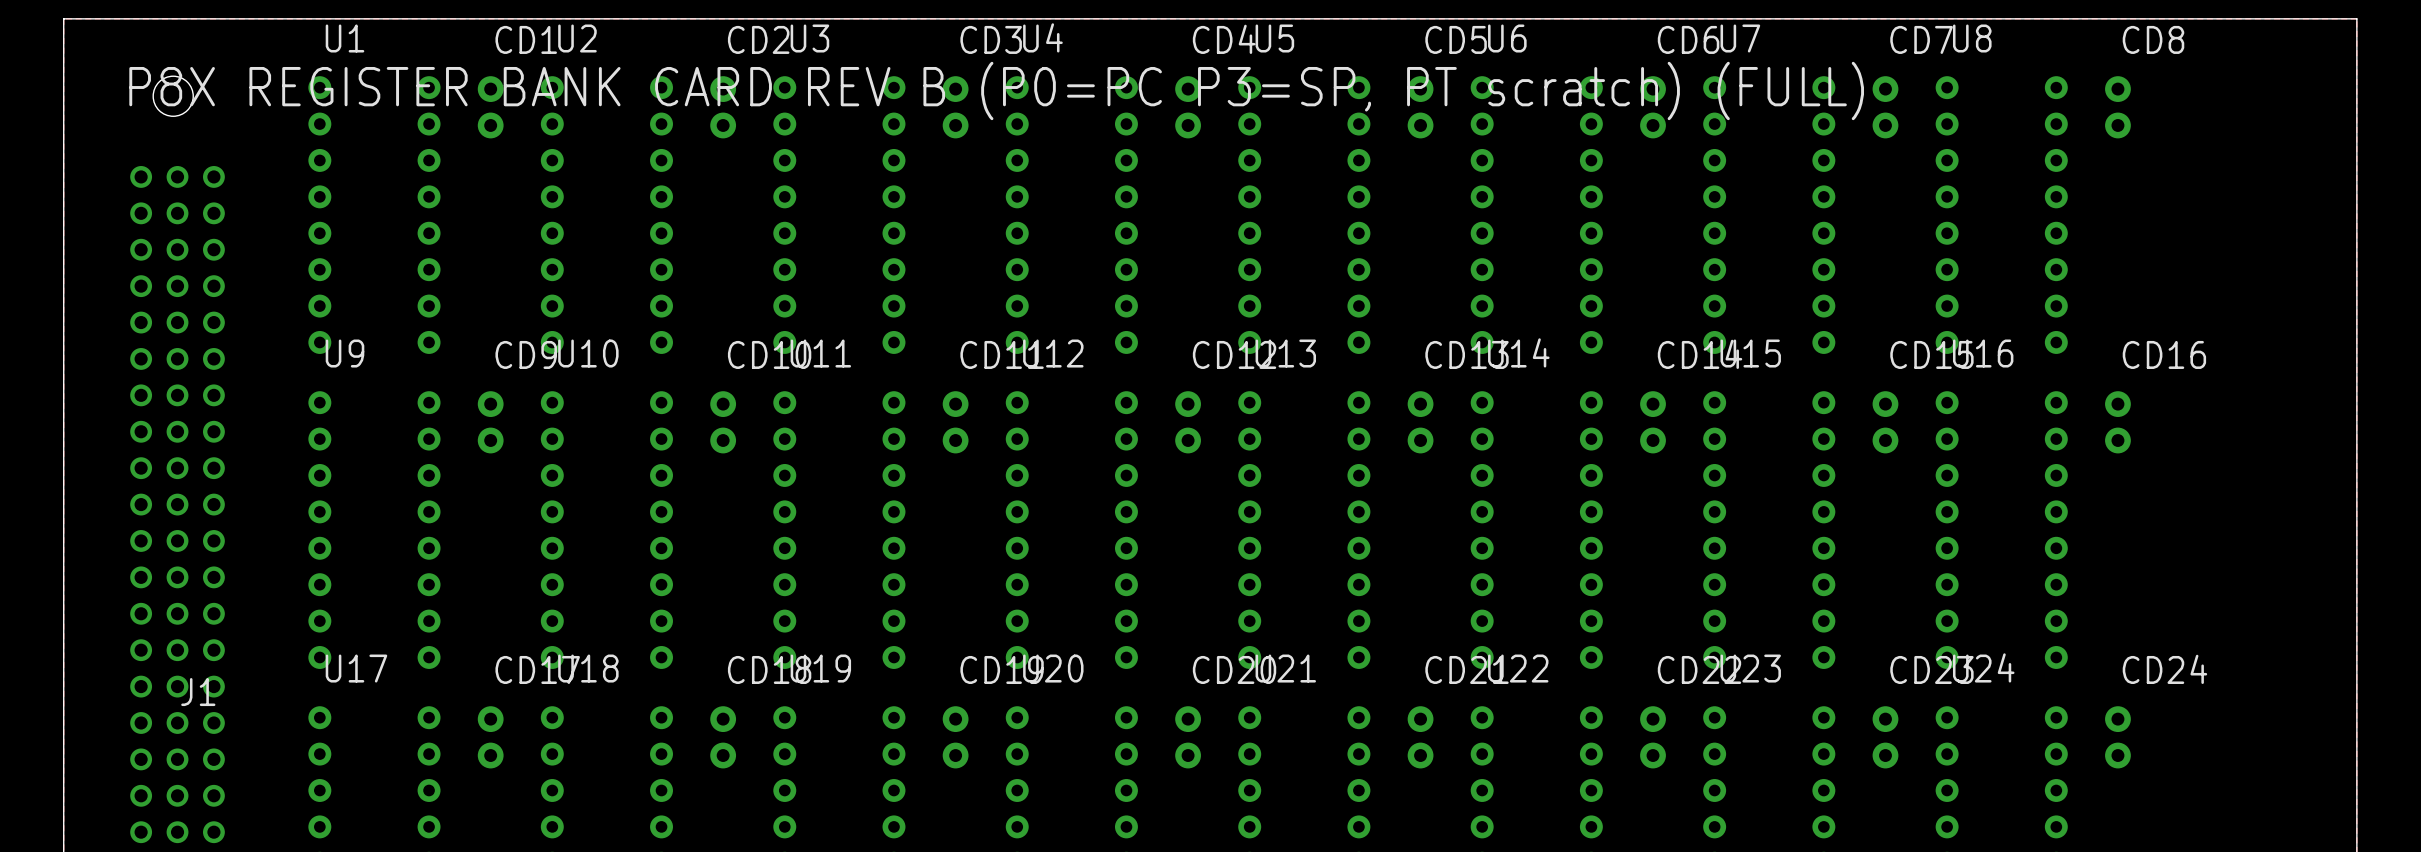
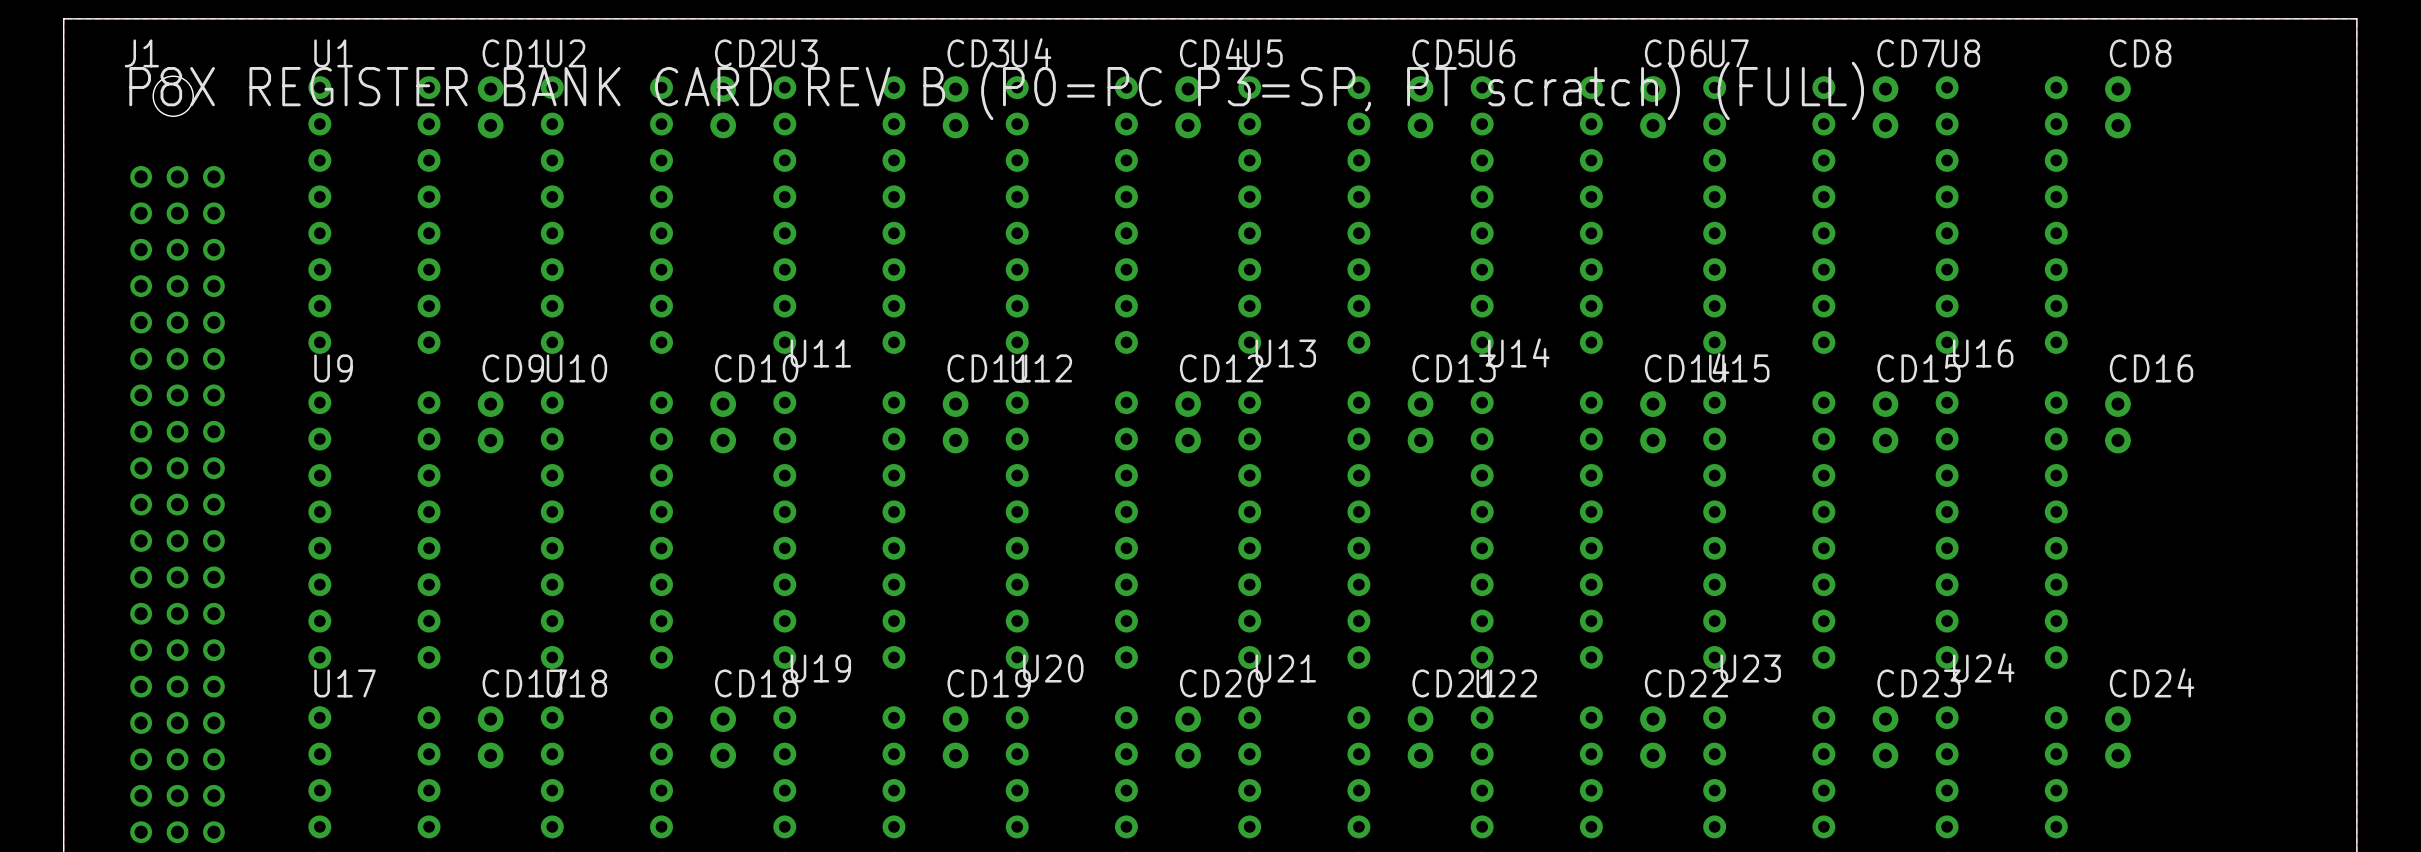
U4 name position: U4 (1042, 37) -> U4 (1031, 52)
U1 name position: U1 (345, 38) -> U1 (333, 53)
U2 name position: U2 (577, 38) -> U2 (566, 53)
U3 name position: U3 (809, 38) -> U3 (798, 53)
U5 name position: U5 (1274, 38) -> U5 (1263, 53)
U6 name position: U6 (1507, 38) -> U6 (1495, 53)
U7 name position: U7 (1740, 38) -> U7 (1728, 53)
U8 name position: U8 (1972, 38) -> U8 (1960, 53)
CD1 name position: CD1 (526, 39) -> CD1 (513, 53)
CD2 name position: CD2 (758, 39) -> CD2 (745, 53)
CD3 name position: CD3 (991, 39) -> CD3 (978, 53)
CD4 name position: CD4 (1224, 39) -> CD4 (1211, 52)
CD5 name position: CD5 (1456, 39) -> CD5 (1443, 53)
CD6 name position: CD6 (1688, 39) -> CD6 (1675, 53)
CD7 name position: CD7 (1921, 39) -> CD7 (1908, 53)
CD8 name position: CD8 (2153, 39) -> CD8 (2140, 53)
U9 name position: U9 (345, 353) -> U9 (333, 368)
U10 name position: U10 (588, 353) -> U10 (576, 368)
U12 name position: U12 (1053, 353) -> U12 (1041, 368)
U15 name position: U15 (1750, 353) -> U15 (1739, 368)
CD9 name position: CD9 (526, 354) -> CD9 (513, 368)
CD10 name position: CD10 (769, 354) -> CD10 (756, 368)
CD11 name position: CD11 (1002, 354) -> CD11 (989, 368)
CD12 name position: CD12 (1234, 354) -> CD12 (1221, 368)
CD13 name position: CD13 (1467, 354) -> CD13 (1454, 368)
CD14 name position: CD14 (1700, 354) -> CD14 (1687, 367)
CD15 name position: CD15 (1931, 354) -> CD15 (1919, 368)
CD16 name position: CD16 (2164, 354) -> CD16 (2151, 368)
U17 name position: U17 (356, 668) -> U17 (345, 683)
U18 name position: U18 (588, 668) -> U18 (576, 683)
U22 name position: U22 (1518, 668) -> U22 (1506, 683)
CD17 name position: CD17 (537, 669) -> CD17 (524, 683)
CD18 name position: CD18 (769, 669) -> CD18 (756, 683)
CD19 name position: CD19 (1002, 669) -> CD19 (989, 683)
CD20 name position: CD20 (1234, 669) -> CD20 (1221, 683)
CD21 name position: CD21 (1467, 669) -> CD21 (1454, 683)
CD22 name position: CD22 (1699, 669) -> CD22 (1686, 683)
CD23 name position: CD23 (1931, 669) -> CD23 (1919, 683)
CD24 name position: CD24 (2164, 669) -> CD24 (2152, 682)
J1 name position: J1 (198, 692) -> J1 (141, 53)

